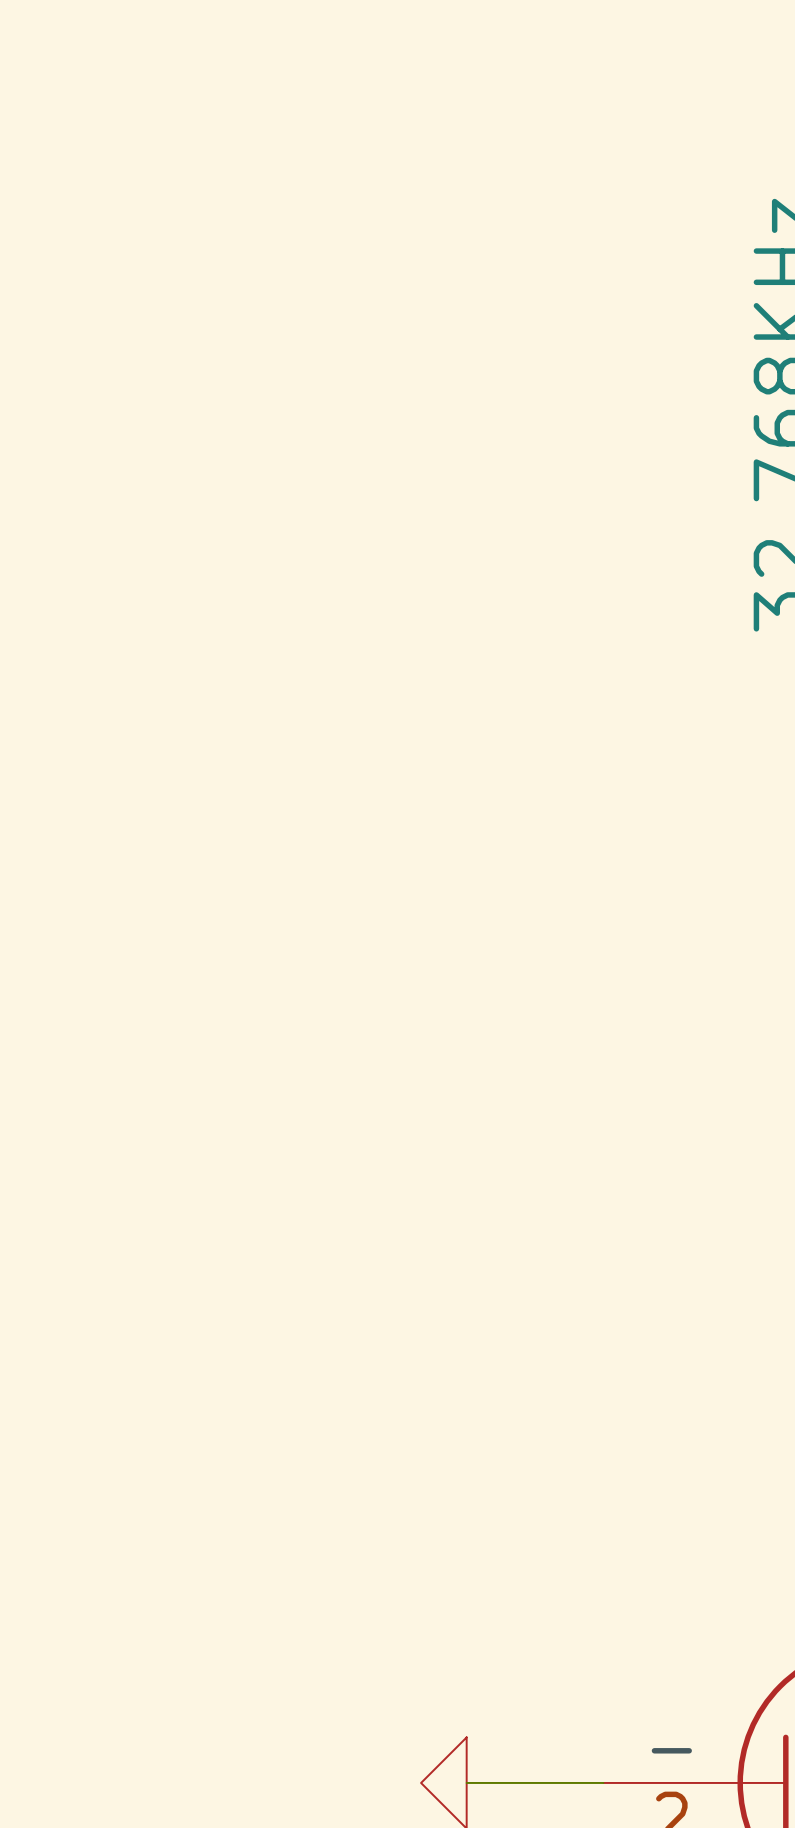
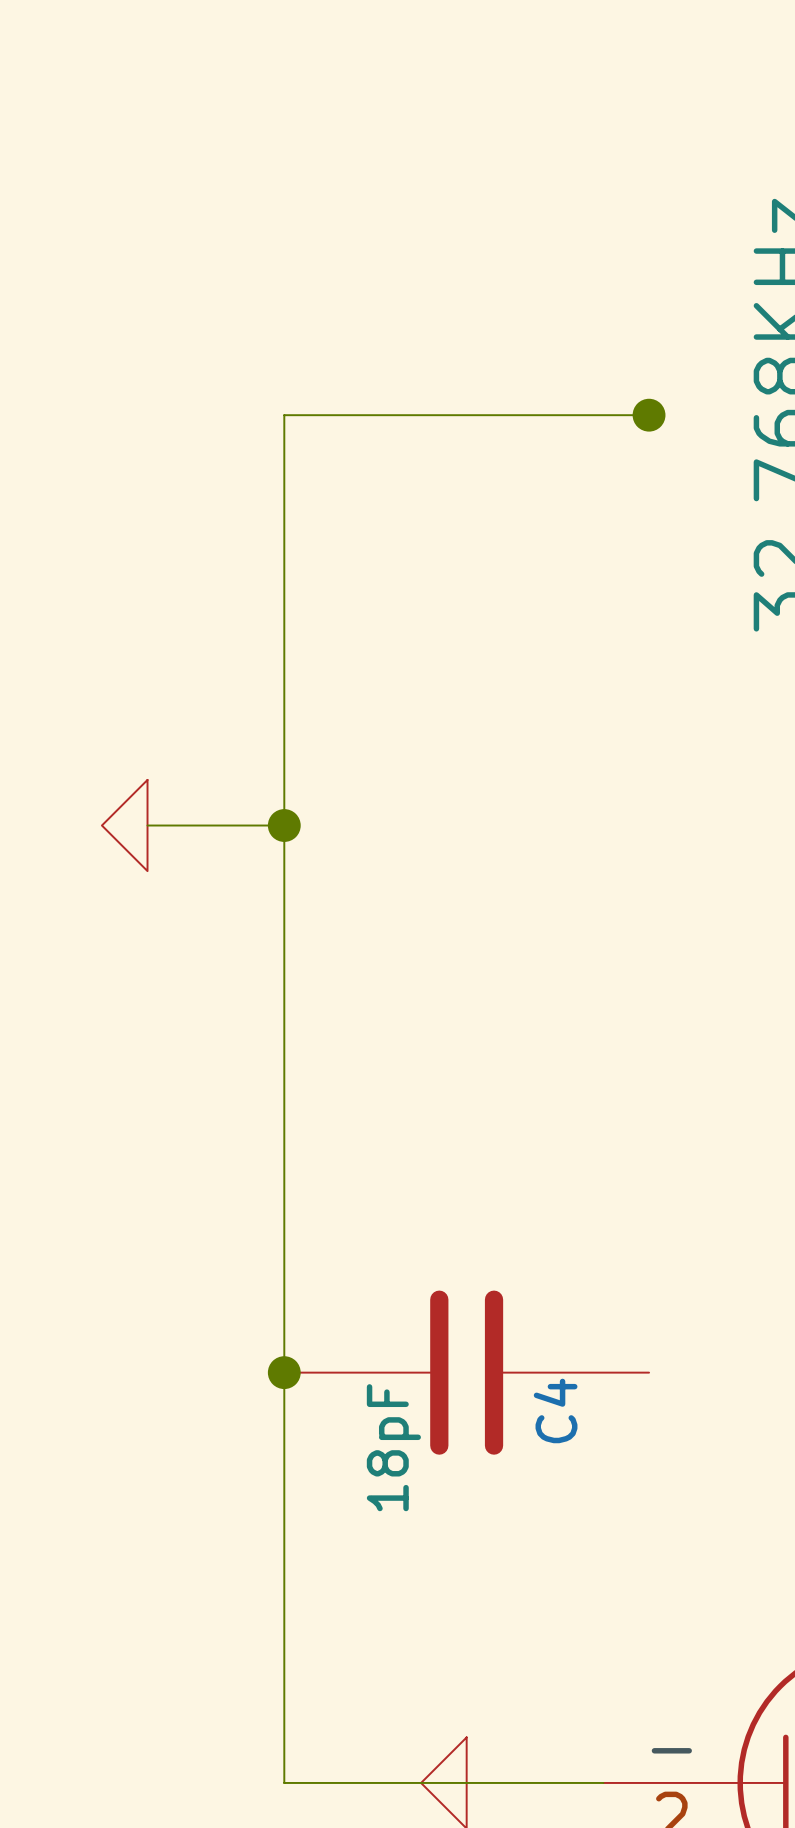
wire: none -> (649, 415) (284, 415) (284, 1782) (466, 1782)
junction: none -> (649, 415)
power symbol: none -> (124, 825)
wire: none -> (147, 825) (284, 825)
junction: none -> (284, 825)
junction: none -> (284, 1372)
C4: none -> 18pF (466, 1372)

